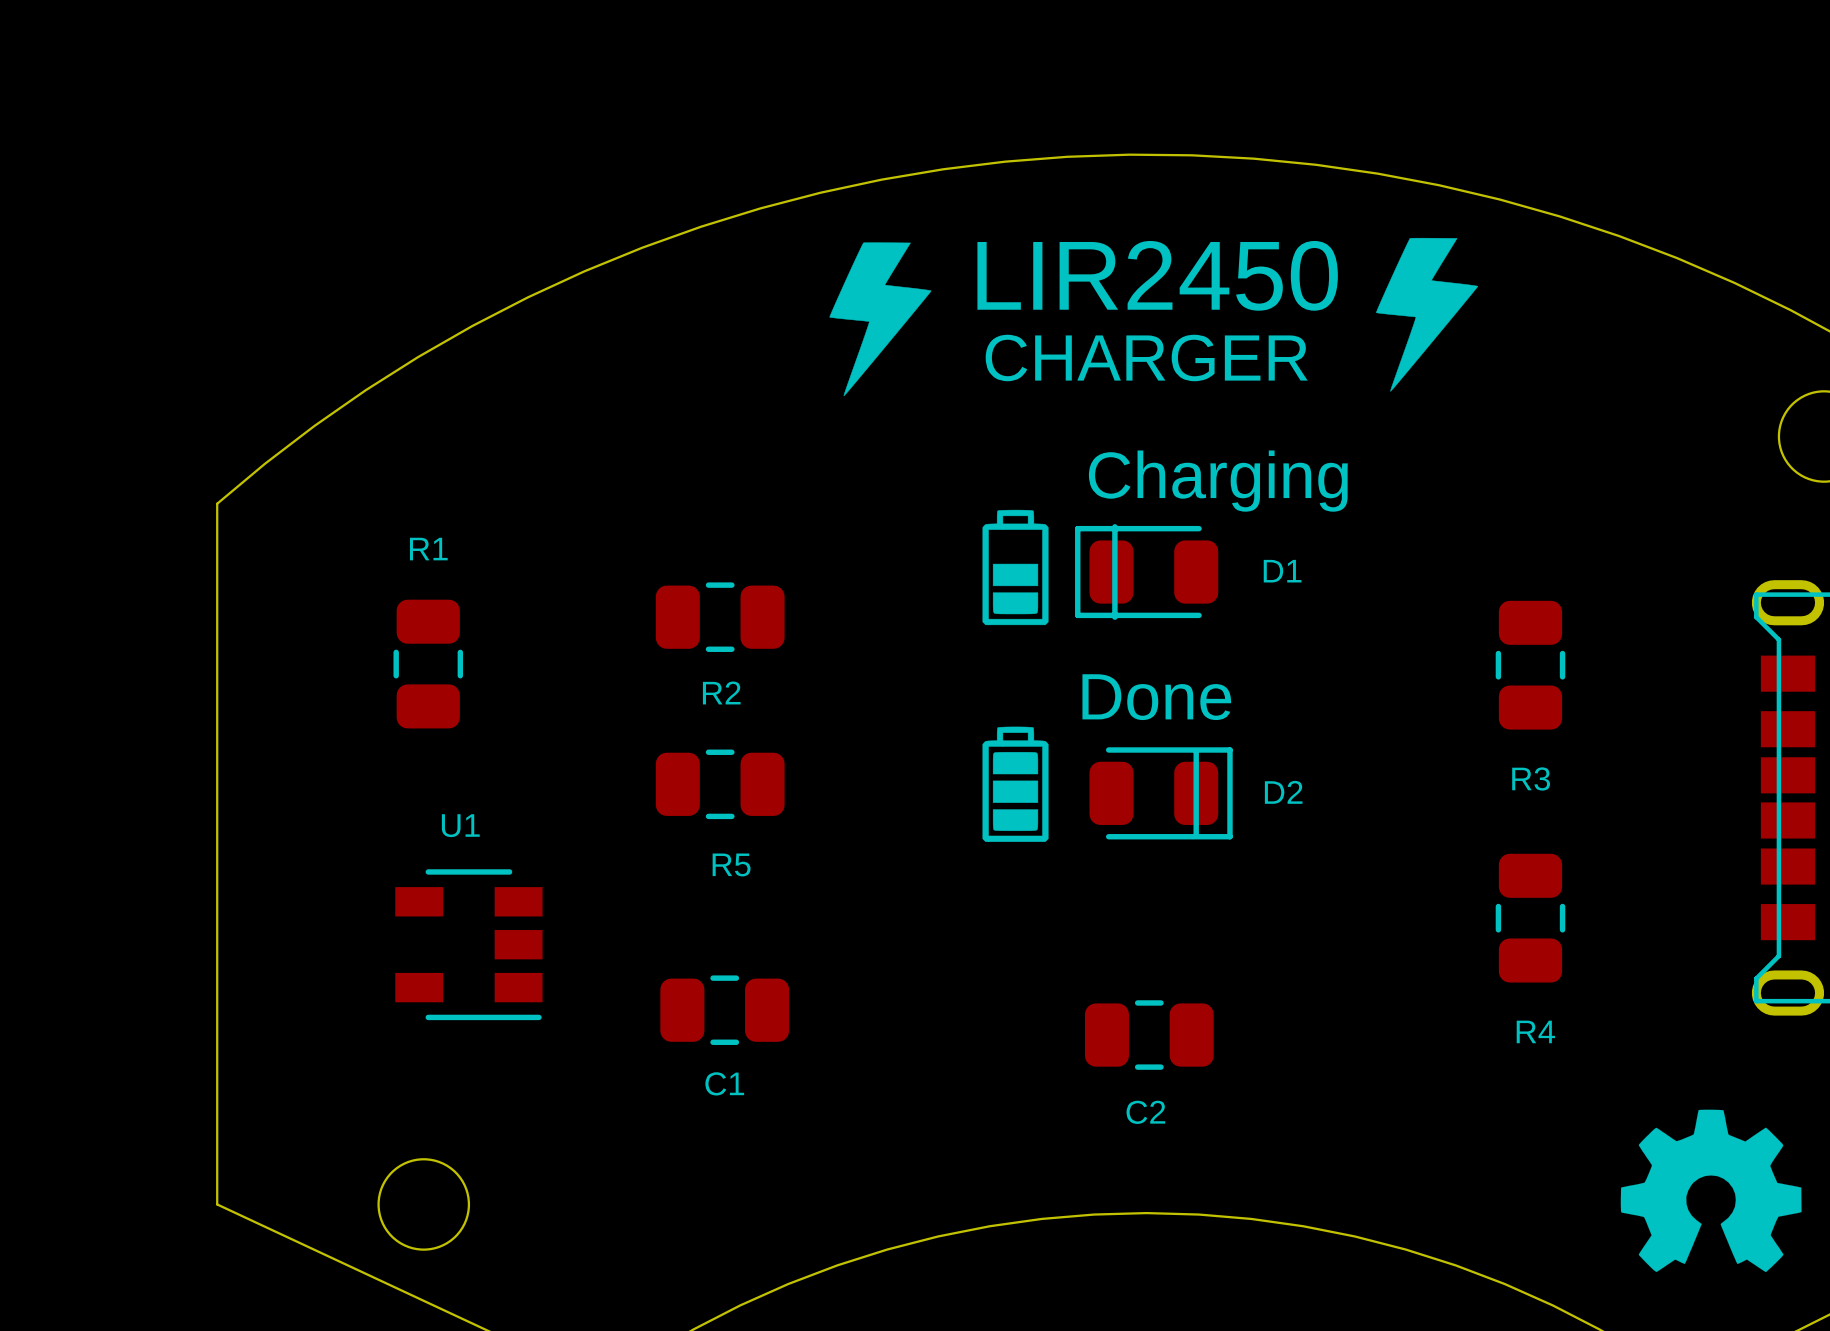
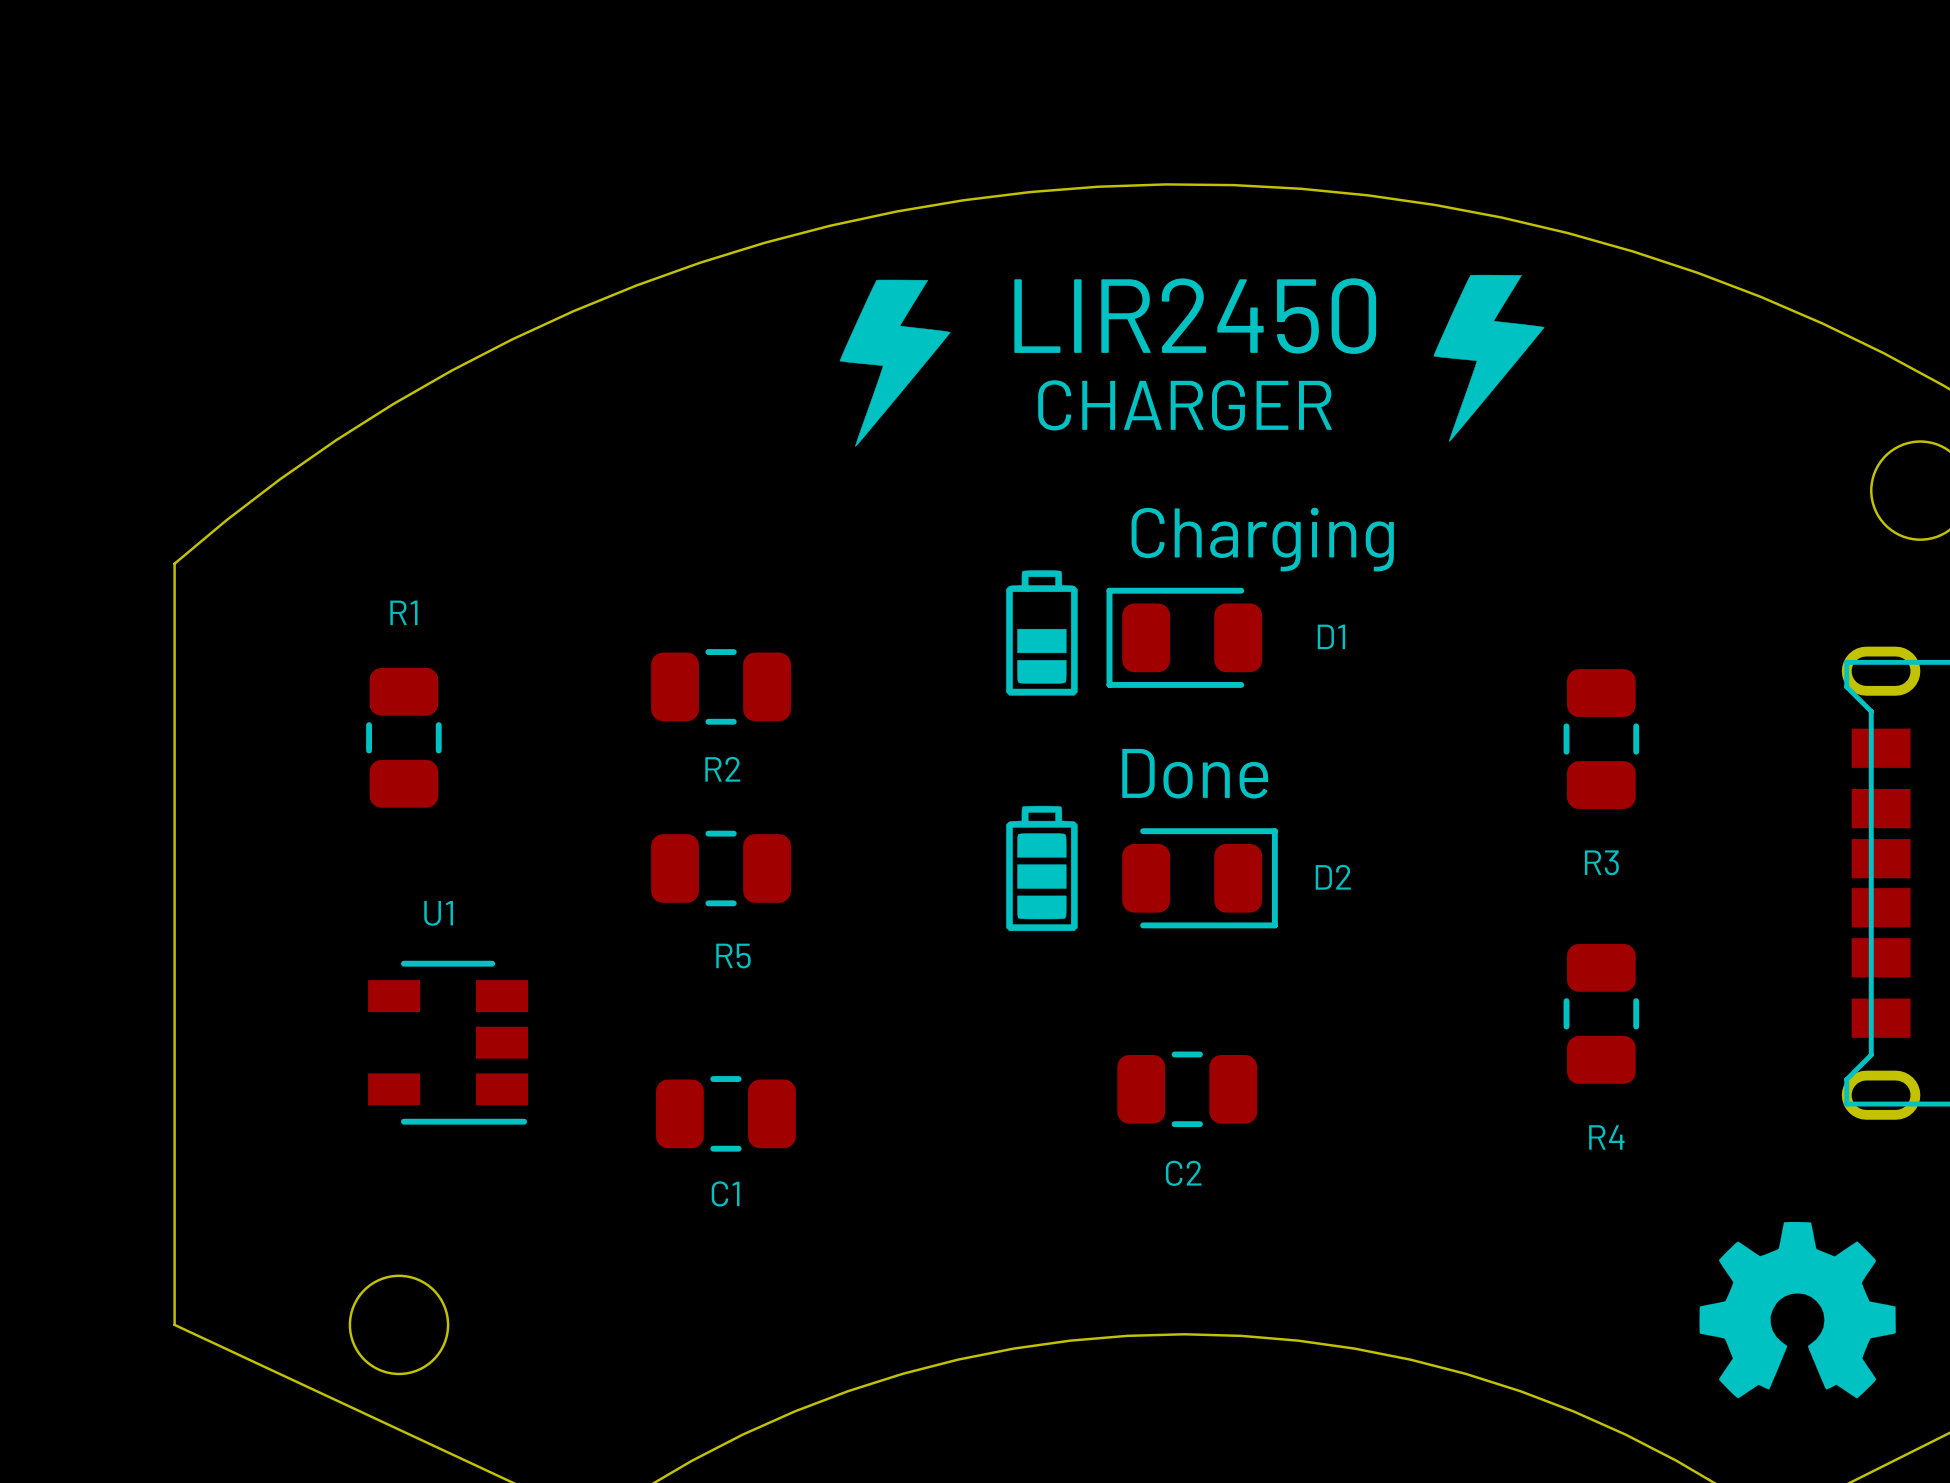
line: (1114, 526) (1114, 617) -> none
line: (1196, 752) (1196, 834) -> none
C2 position: (1149, 1035) -> (1187, 1089)

